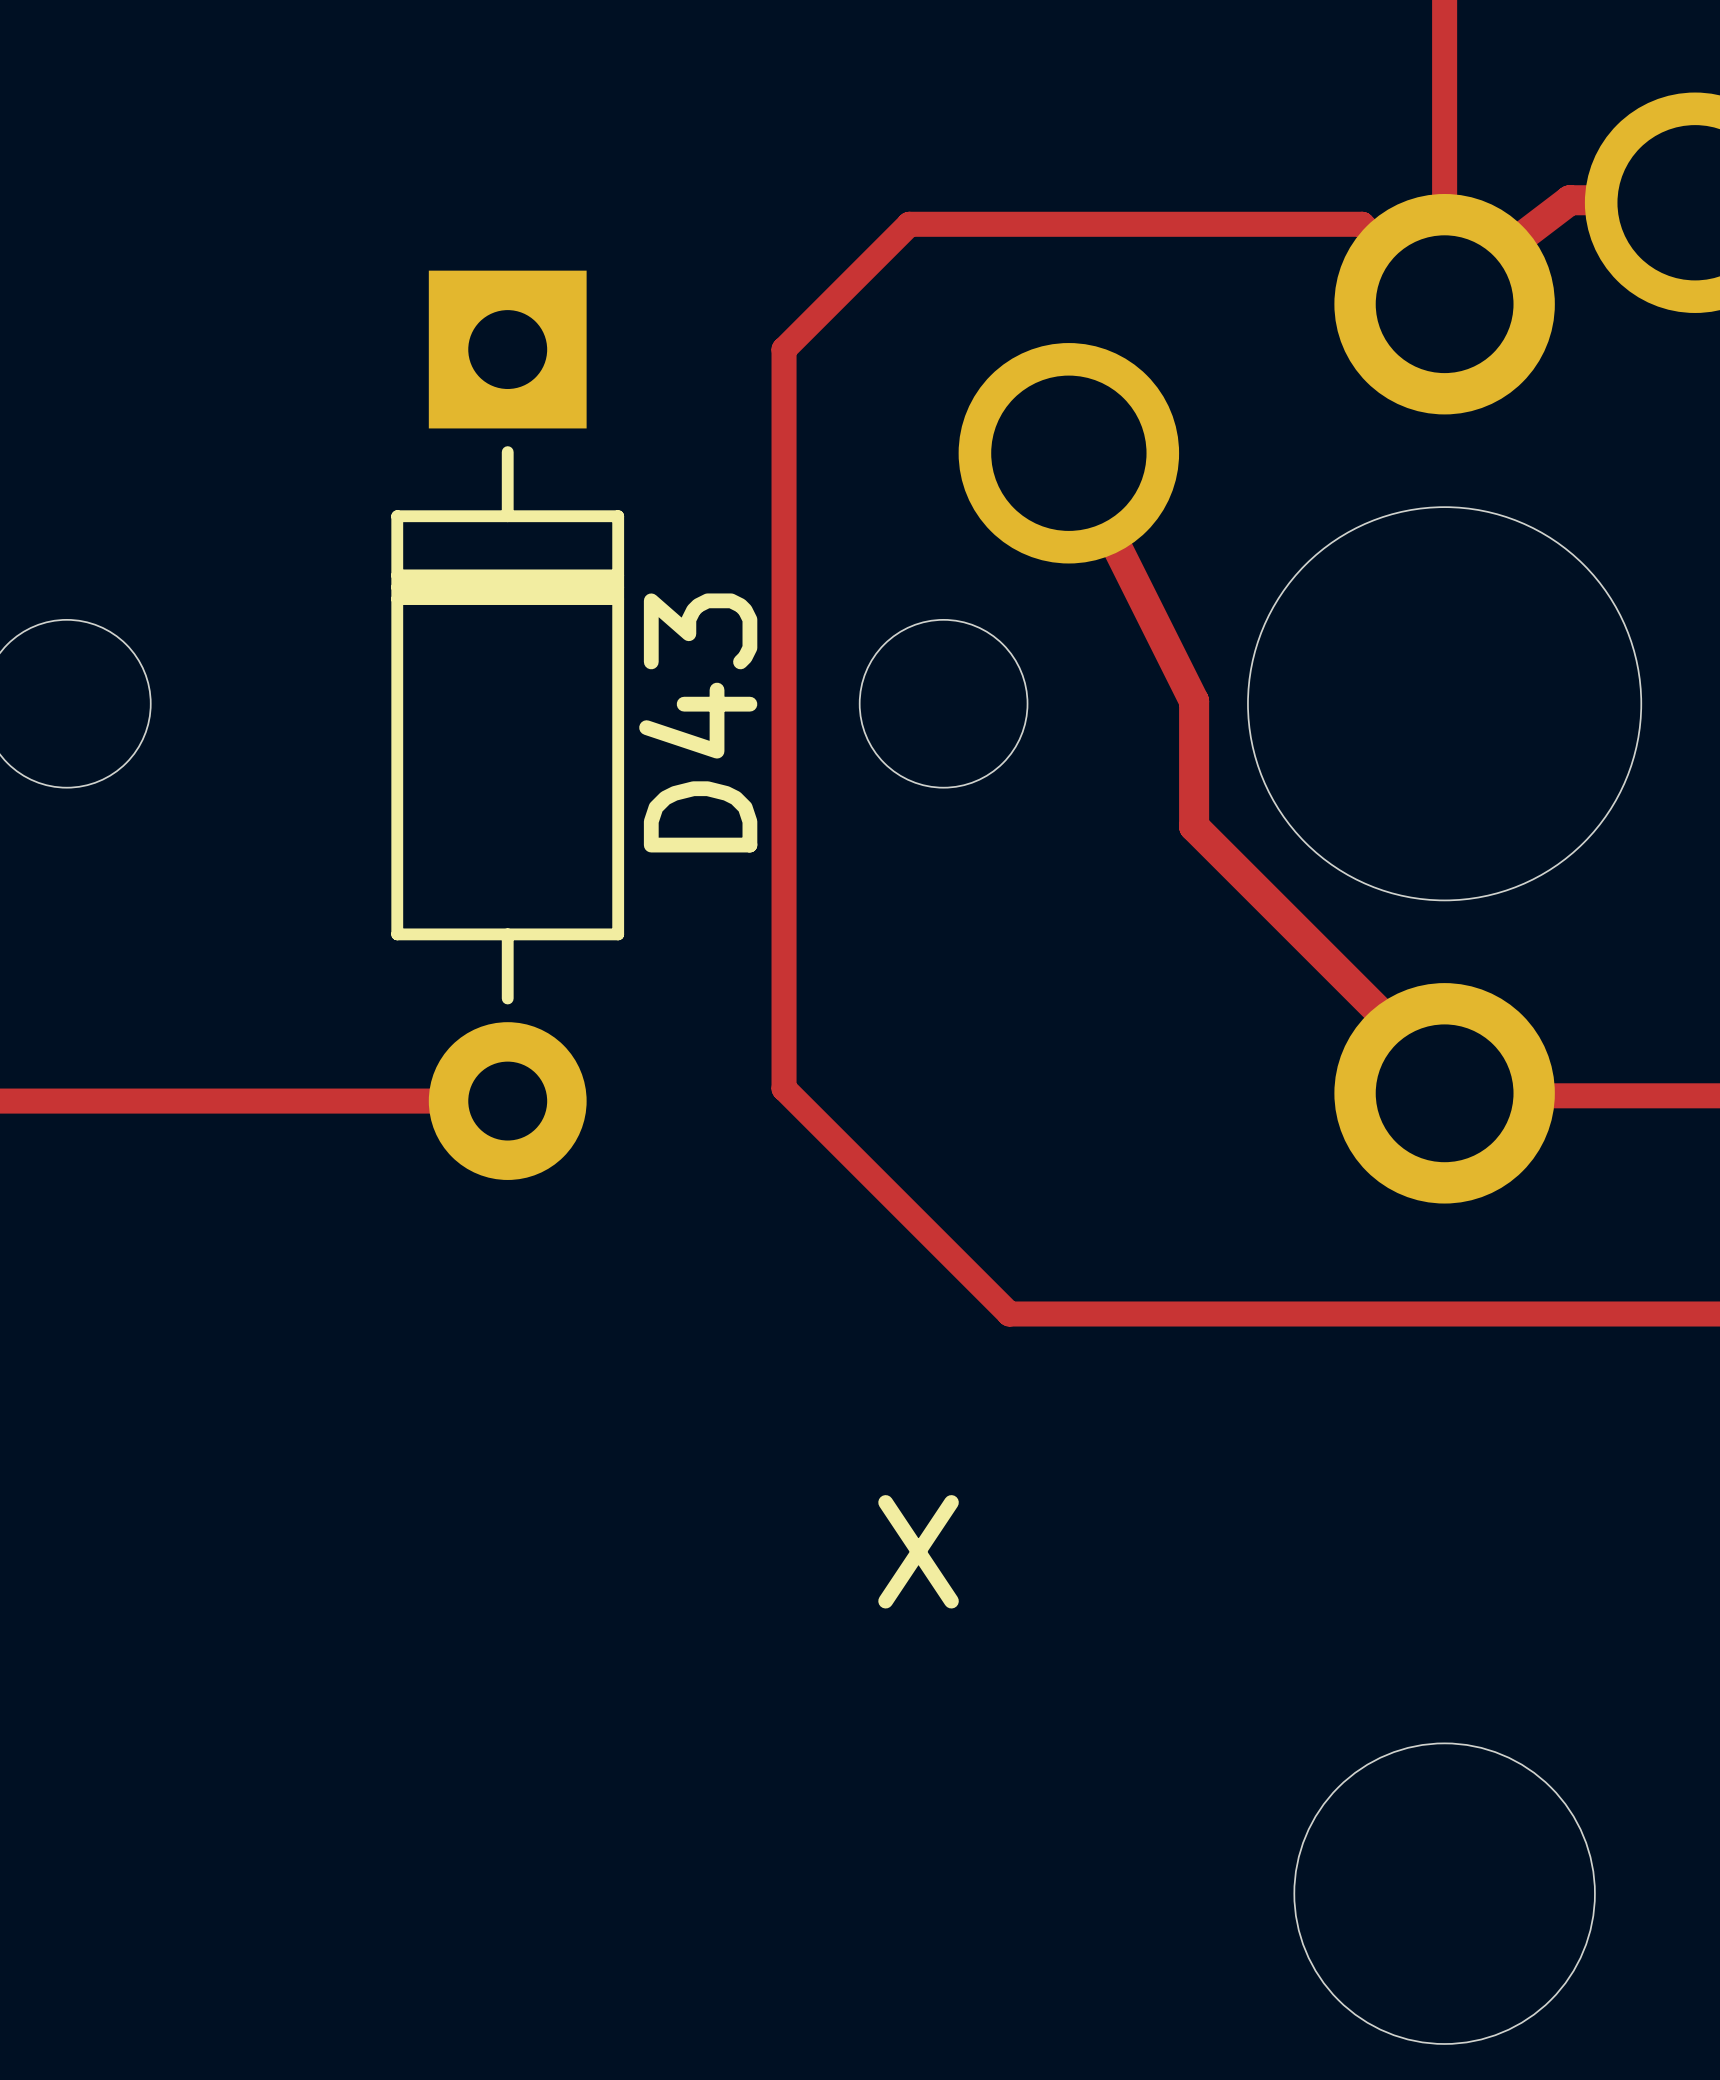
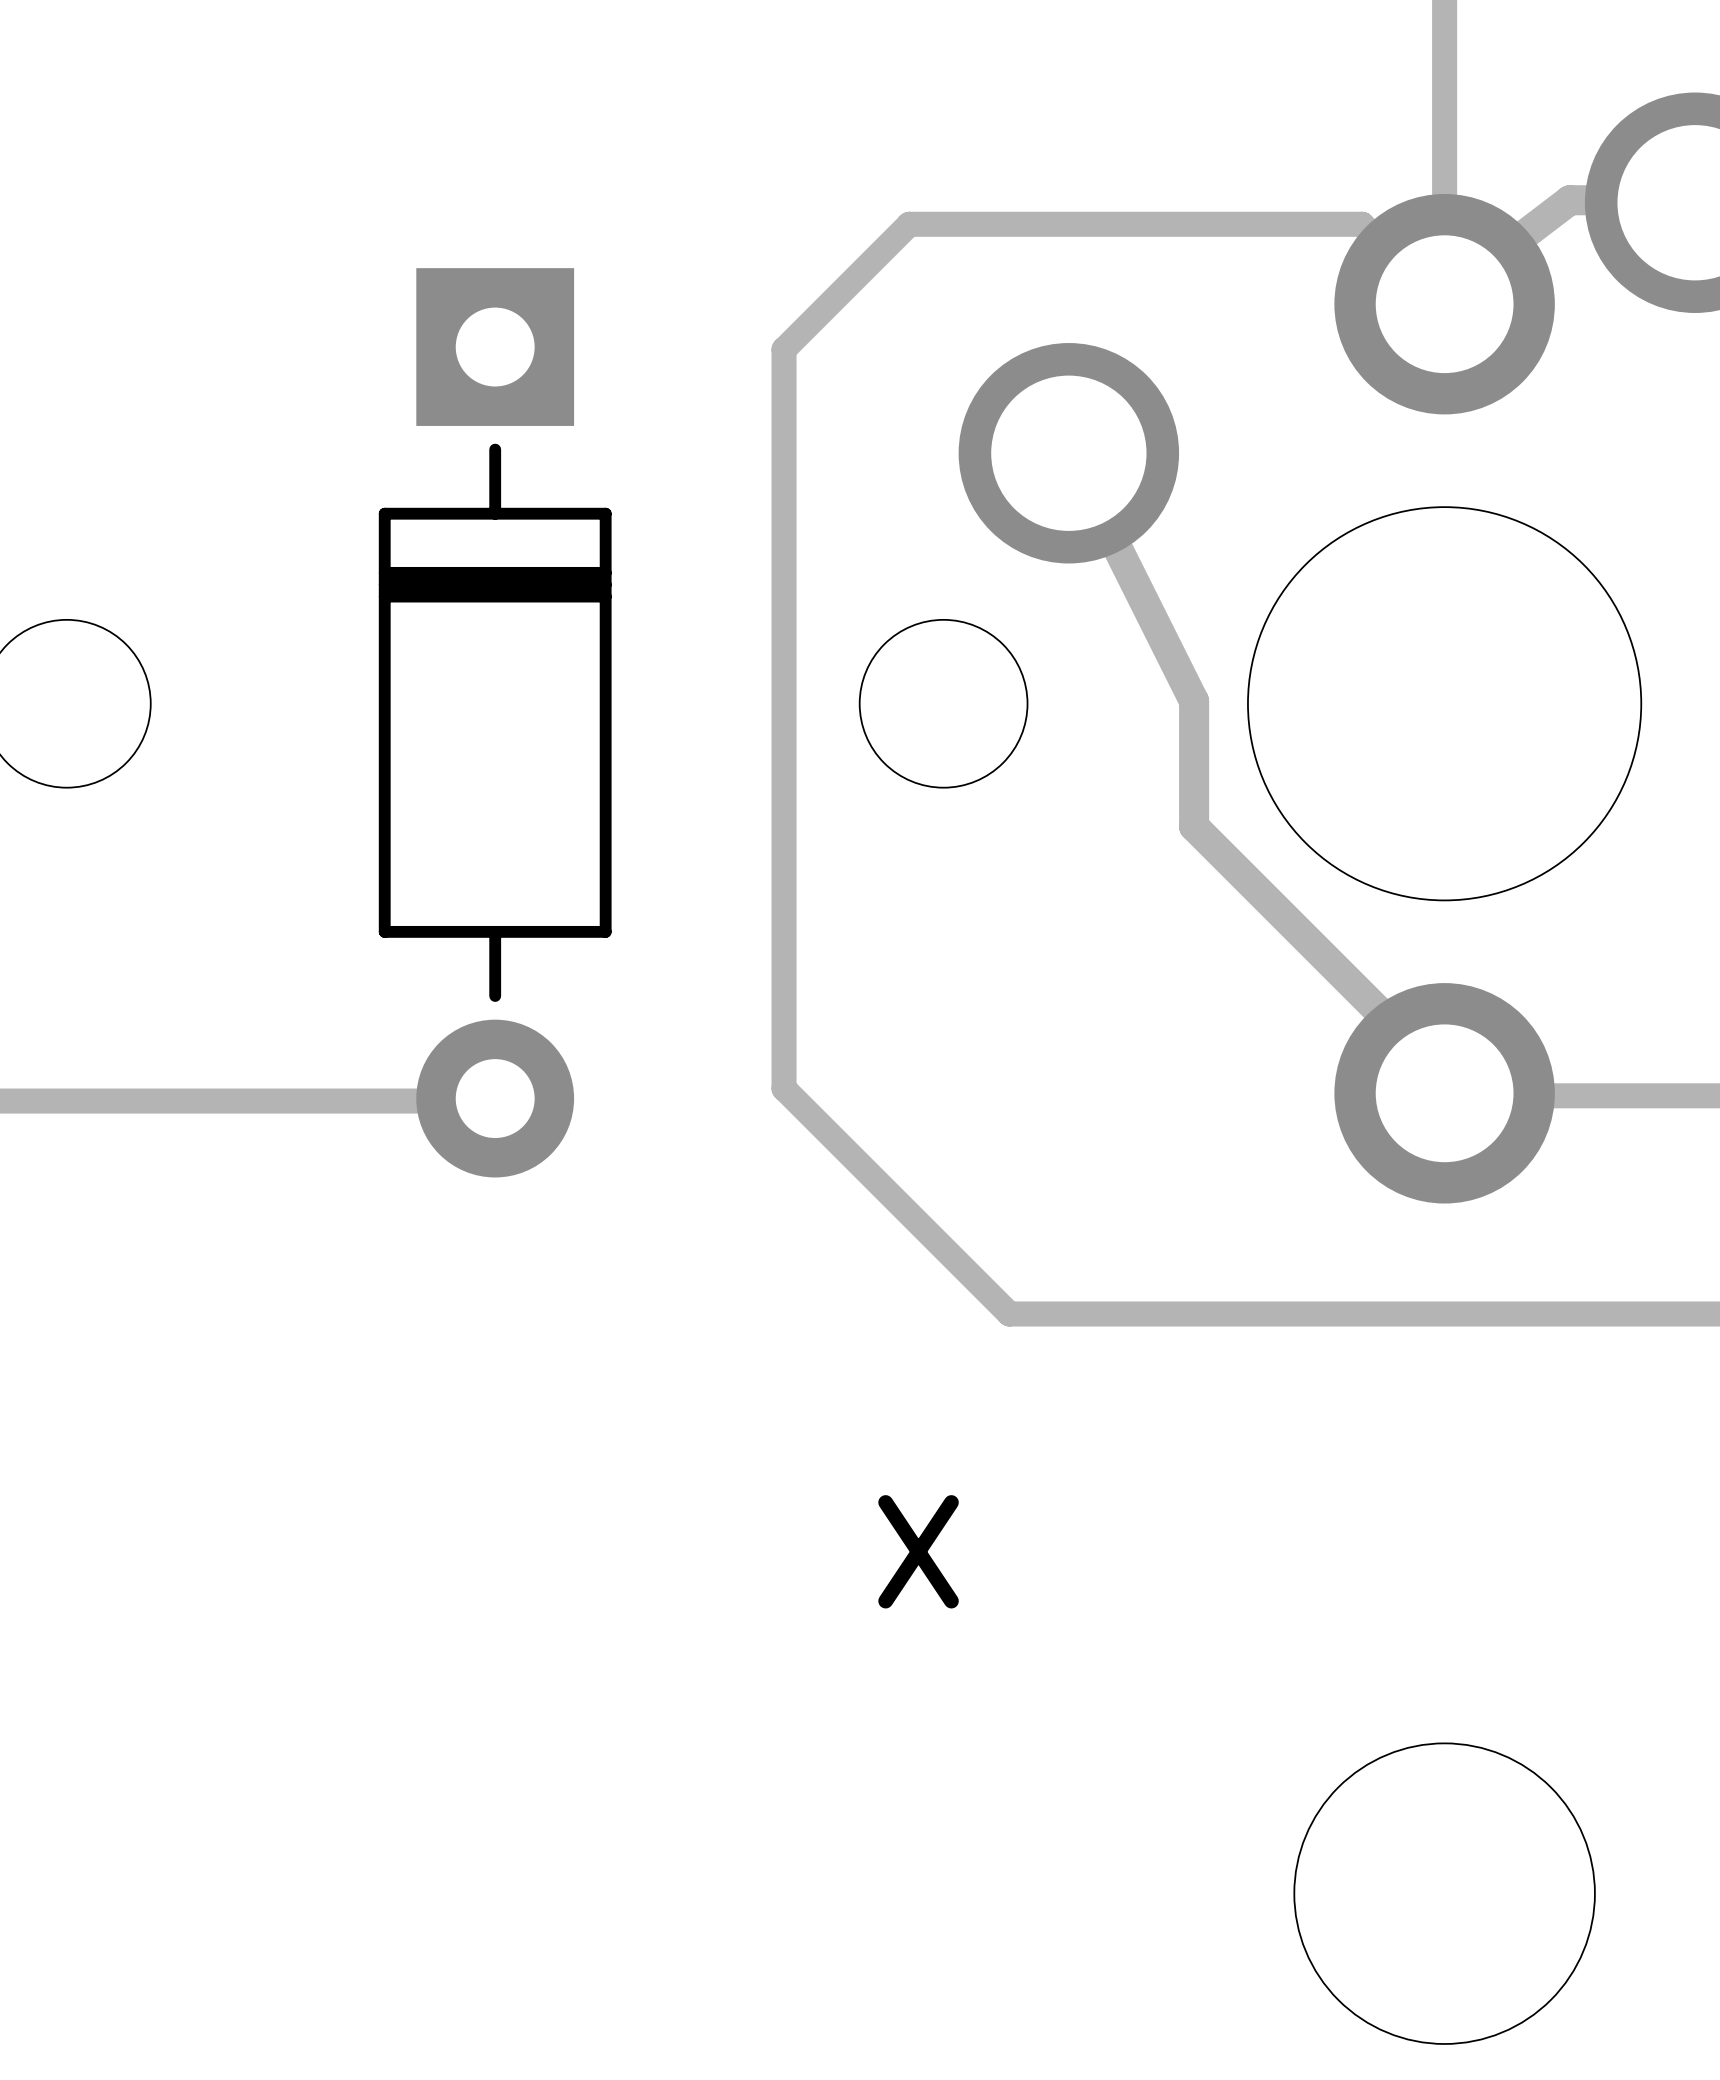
D43 position: (507, 725) -> (495, 722)

